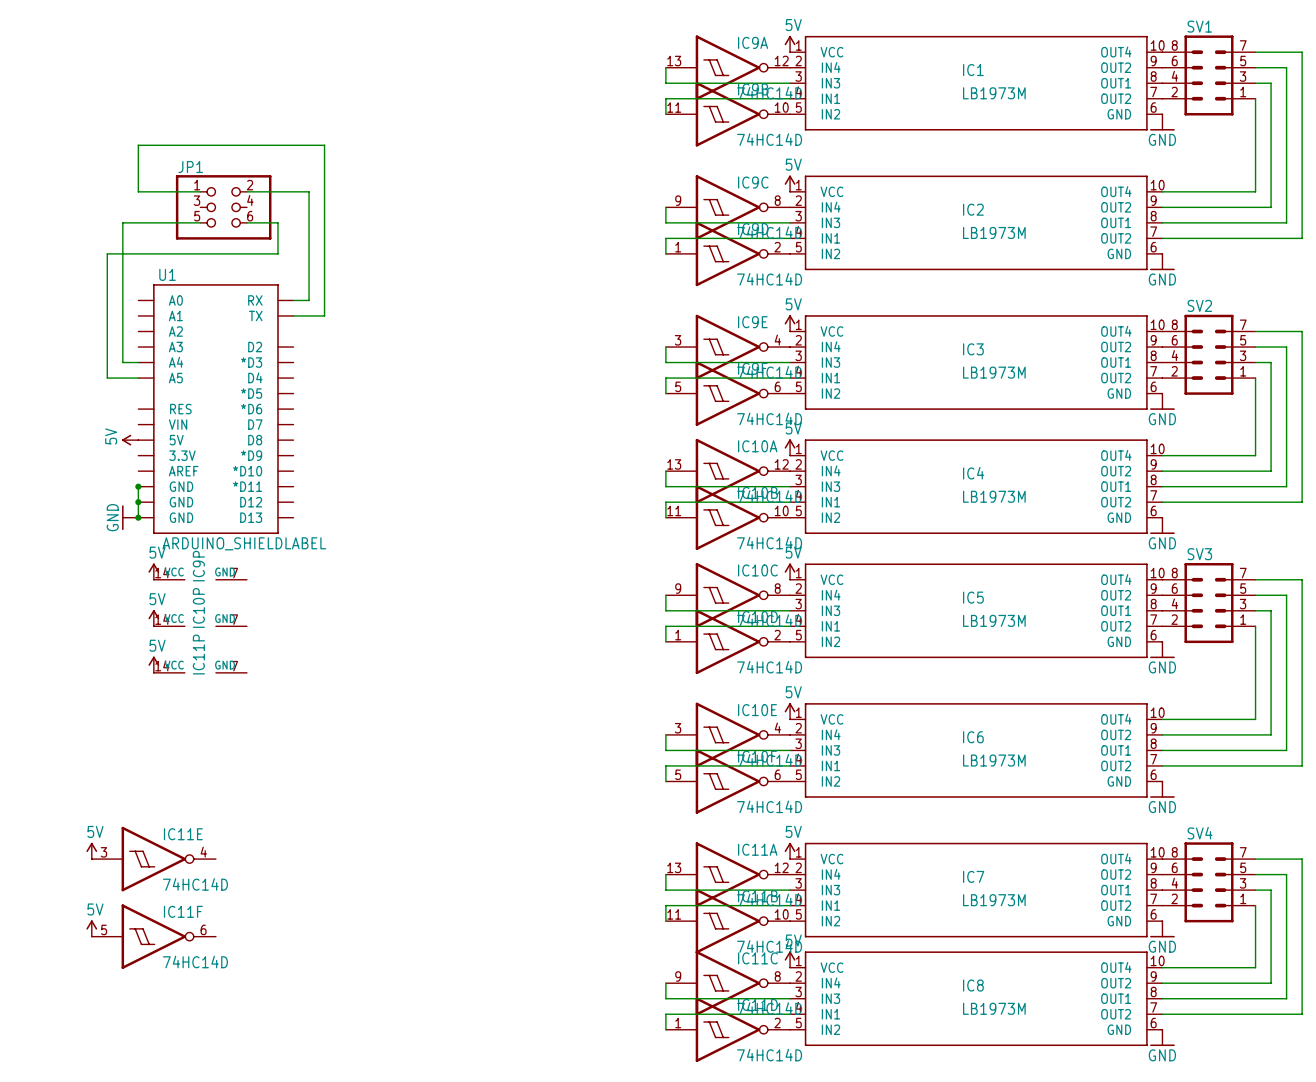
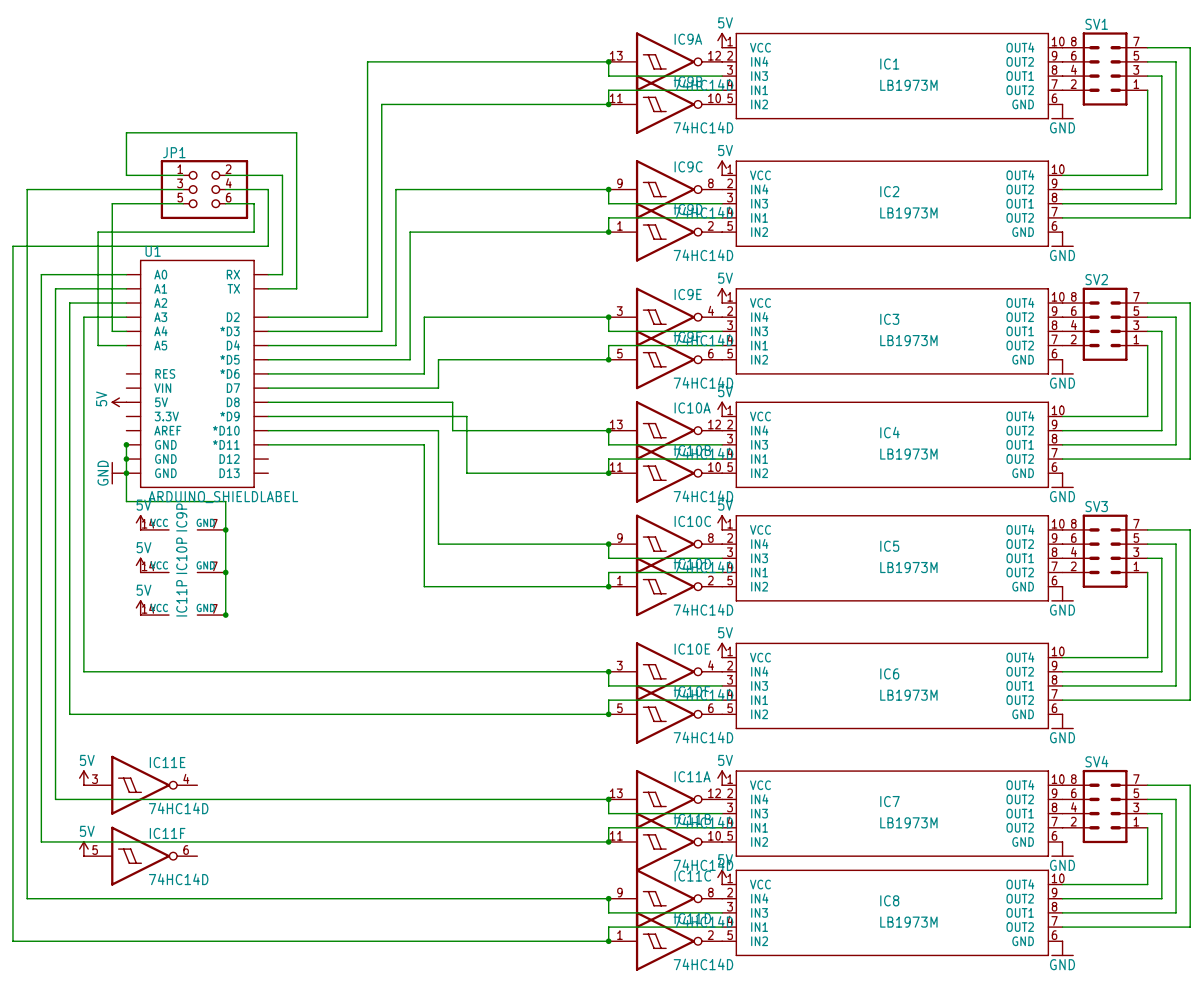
wire: none -> (608, 61) (367, 61) (367, 317) (268, 317)
junction: none -> (608, 61)
wire: none -> (608, 104) (381, 104) (381, 331) (268, 331)
junction: none -> (608, 104)
wire: none -> (183, 189) (27, 189) (27, 898) (608, 898)
wire: none -> (225, 189) (268, 189) (268, 246) (12, 246) (12, 941) (608, 941)
wire: none -> (608, 189) (395, 189) (395, 345) (268, 345)
junction: none -> (608, 189)
wire: none -> (608, 232) (410, 232) (410, 359) (268, 359)
junction: none -> (608, 232)
wire: none -> (126, 274) (41, 274) (41, 841) (608, 841)
wire: none -> (126, 288) (55, 288) (55, 799) (608, 799)
wire: none -> (126, 303) (69, 303) (69, 714) (608, 714)
wire: none -> (126, 317) (83, 317) (83, 671) (608, 671)
wire: none -> (608, 317) (424, 317) (424, 373) (268, 373)
junction: none -> (608, 317)
wire: none -> (608, 359) (438, 359) (438, 388) (268, 388)
junction: none -> (608, 359)
wire: none -> (268, 402) (452, 402) (452, 430) (608, 430)
wire: none -> (268, 416) (466, 416) (466, 473) (608, 473)
wire: none -> (268, 430) (438, 430) (438, 544) (608, 544)
junction: none -> (608, 430)
wire: none -> (268, 444) (424, 444) (424, 586) (608, 586)
wire: none -> (126, 473) (126, 501) (225, 501) (225, 615)
junction: none -> (608, 473)
junction: none -> (225, 529)
junction: none -> (608, 544)
junction: none -> (225, 572)
junction: none -> (608, 586)
junction: none -> (225, 615)
junction: none -> (608, 671)
junction: none -> (608, 714)
junction: none -> (608, 799)
junction: none -> (608, 841)
junction: none -> (608, 898)
junction: none -> (608, 941)

